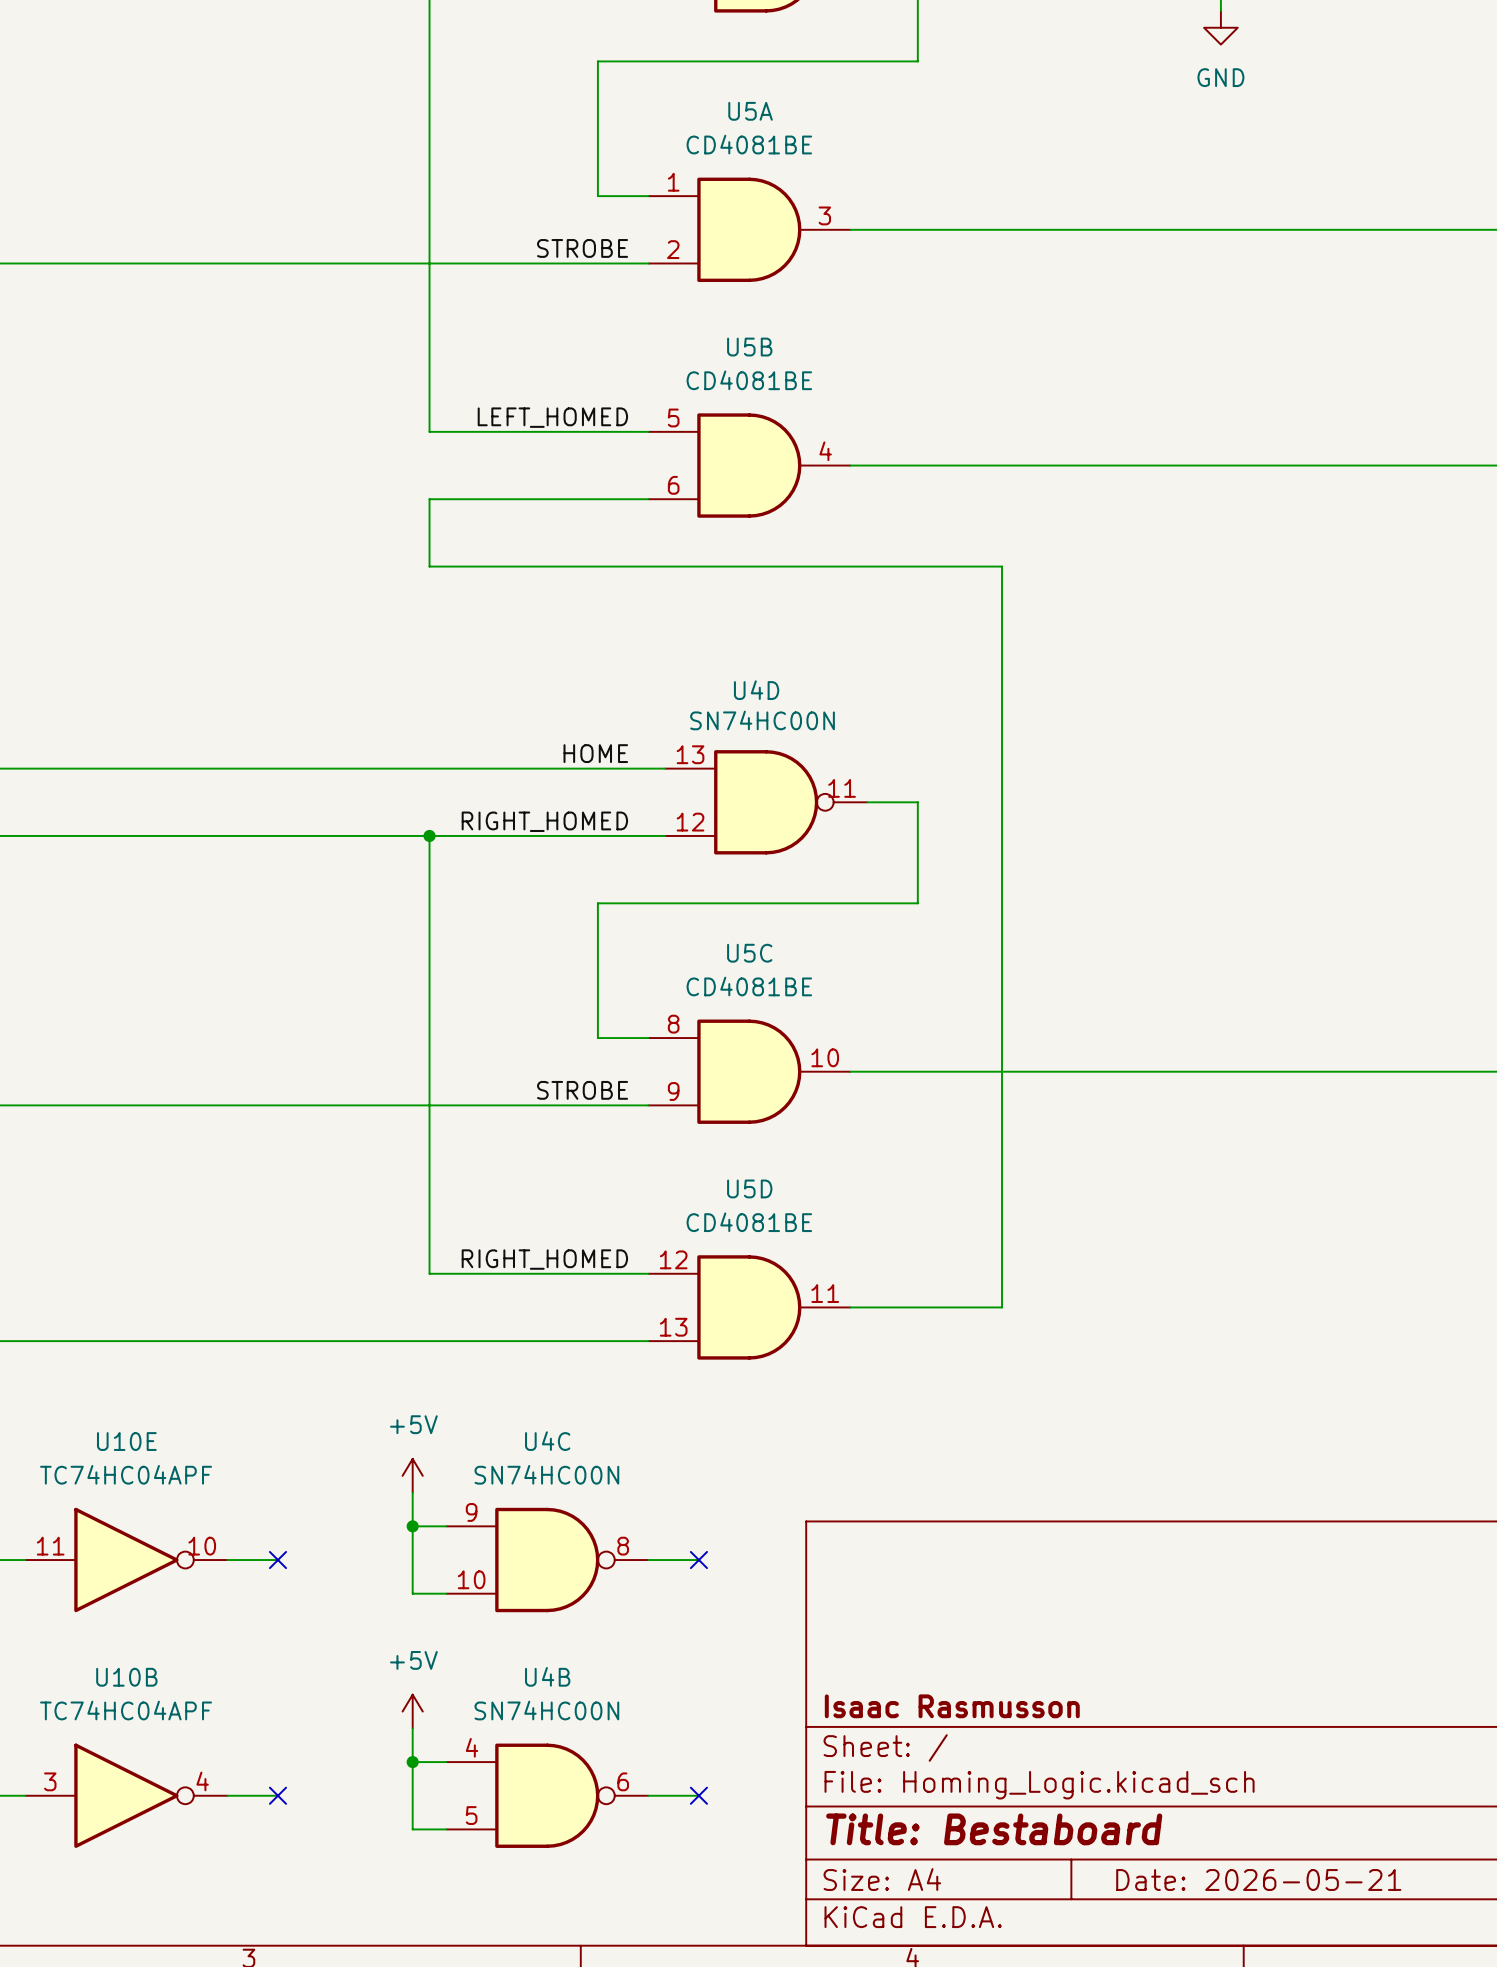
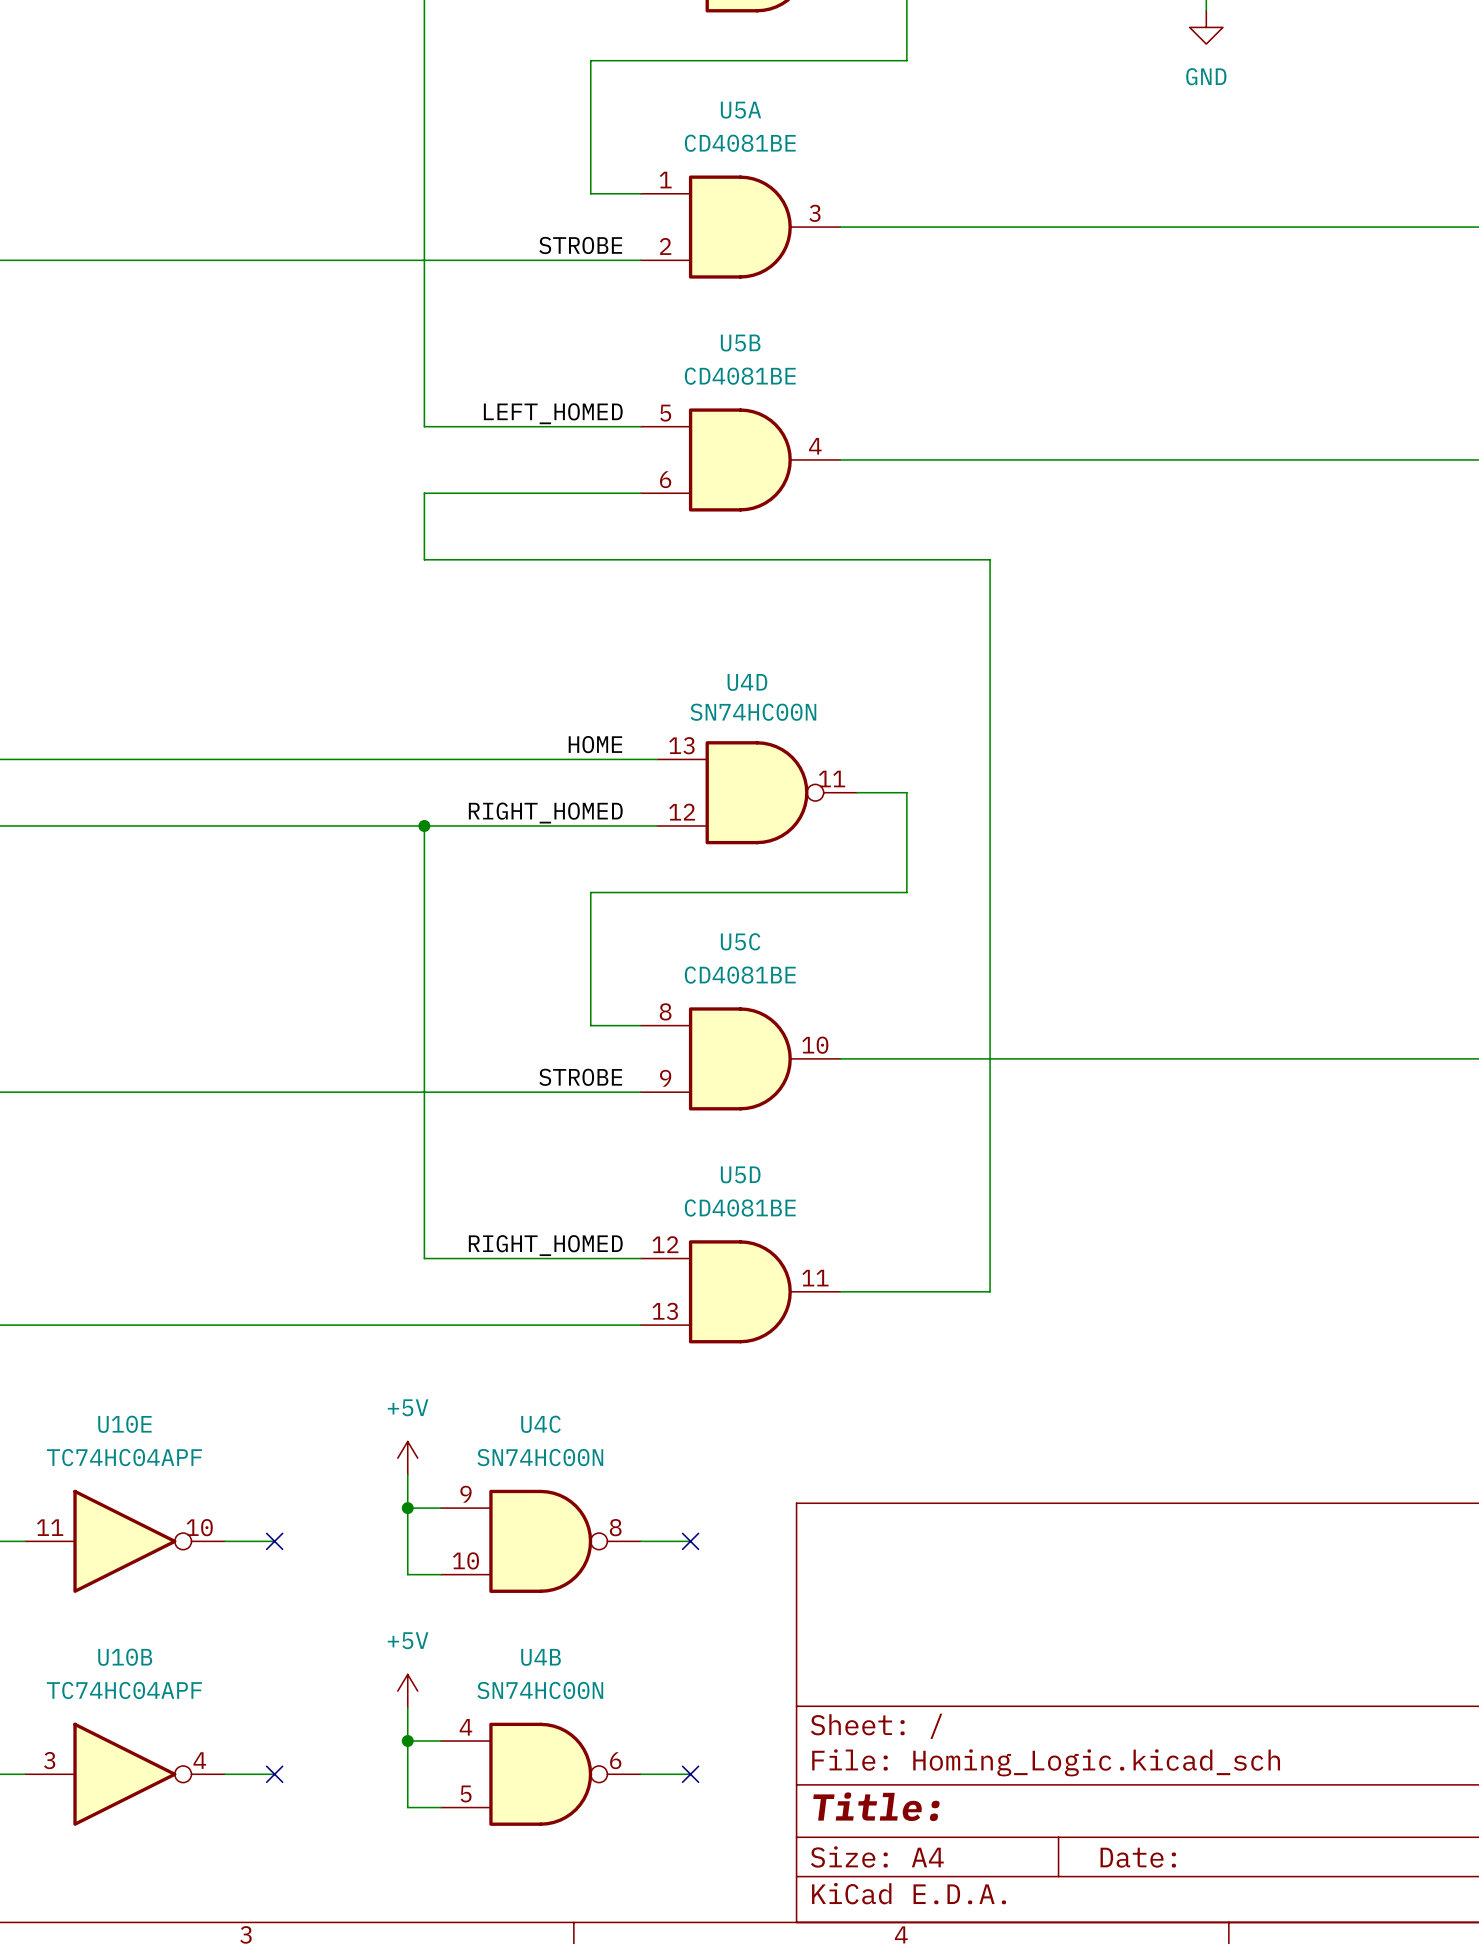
title block: Isaac Rasmusson (952, 1706) -> none
title block: Title: Bestaboard (994, 1829) -> Title: (876, 1806)
title block: Date: 2026-05-21 (1258, 1879) -> Date: (1138, 1857)

